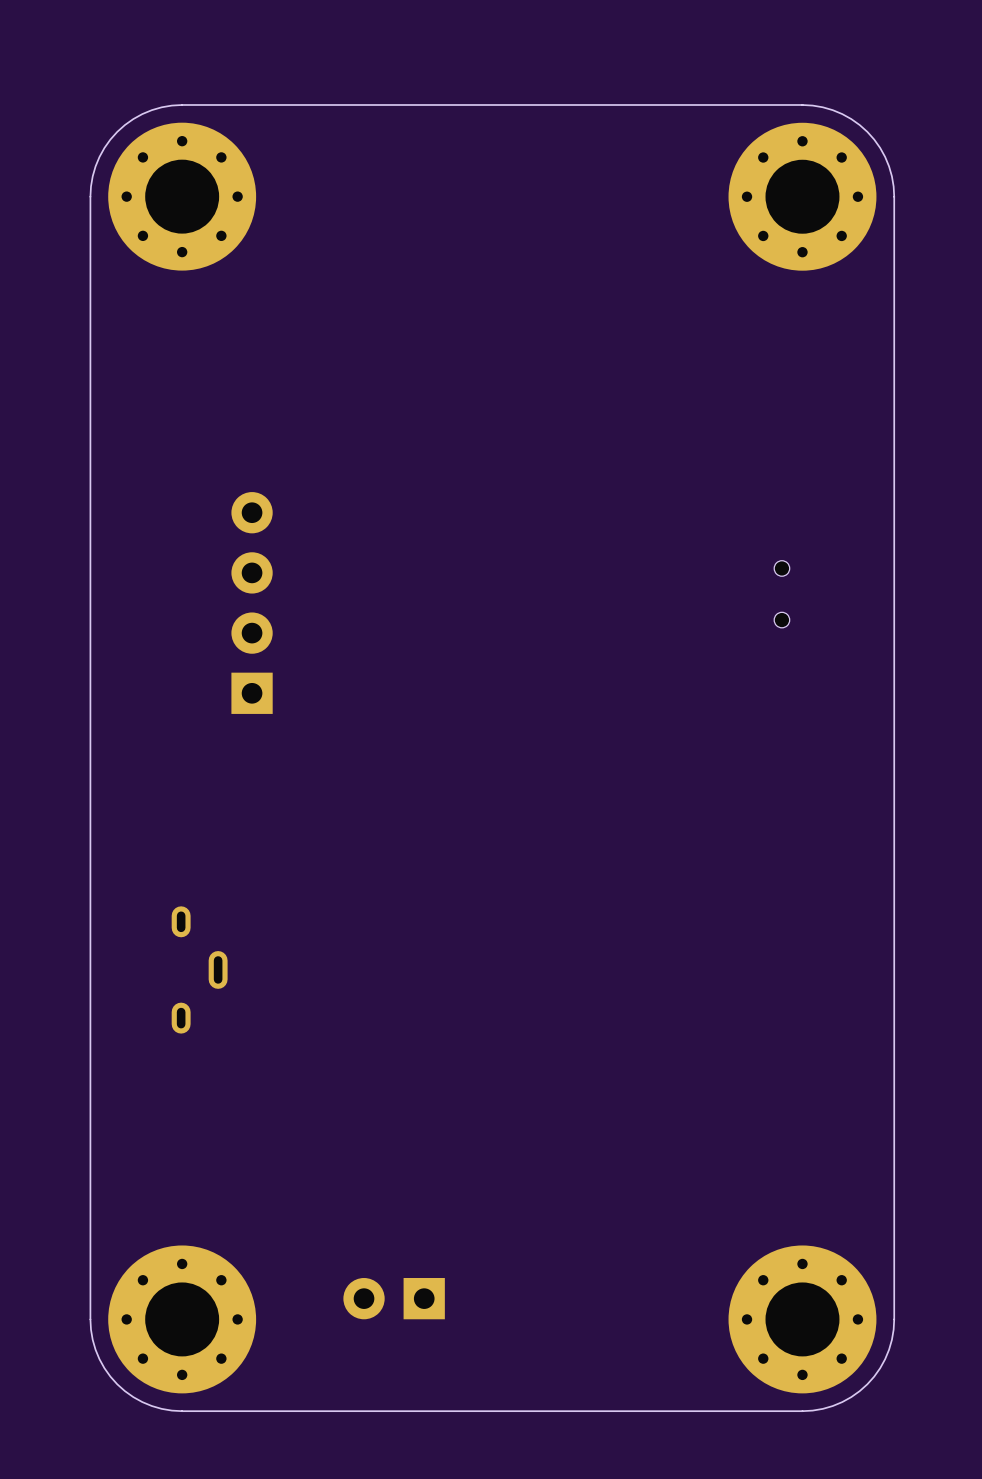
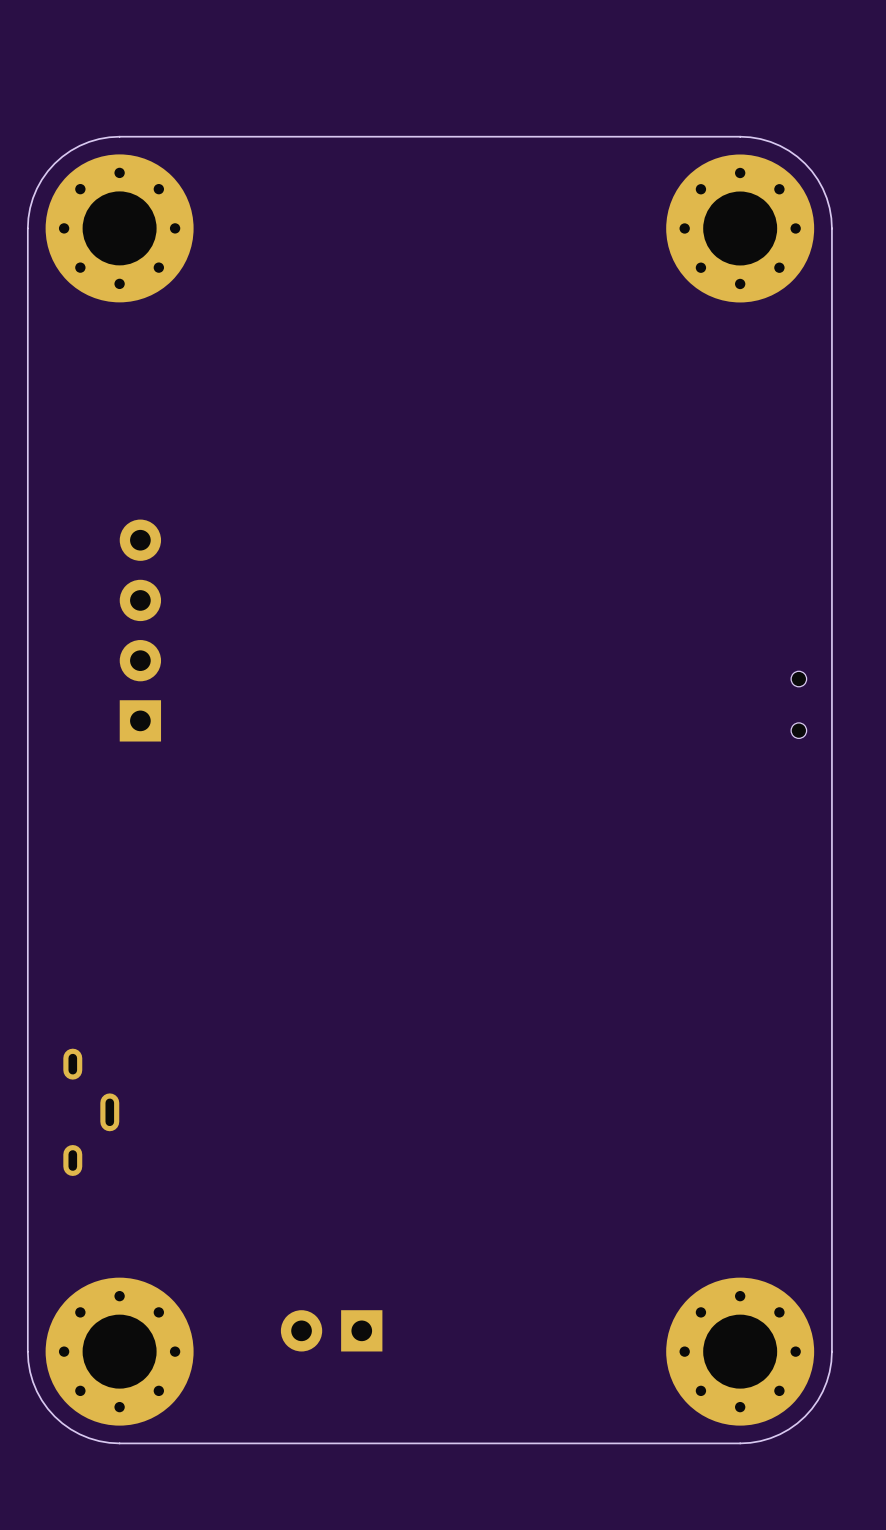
part position: (781, 594) -> (798, 704)
part position: (252, 603) -> (140, 630)
part position: (199, 969) -> (91, 1112)

